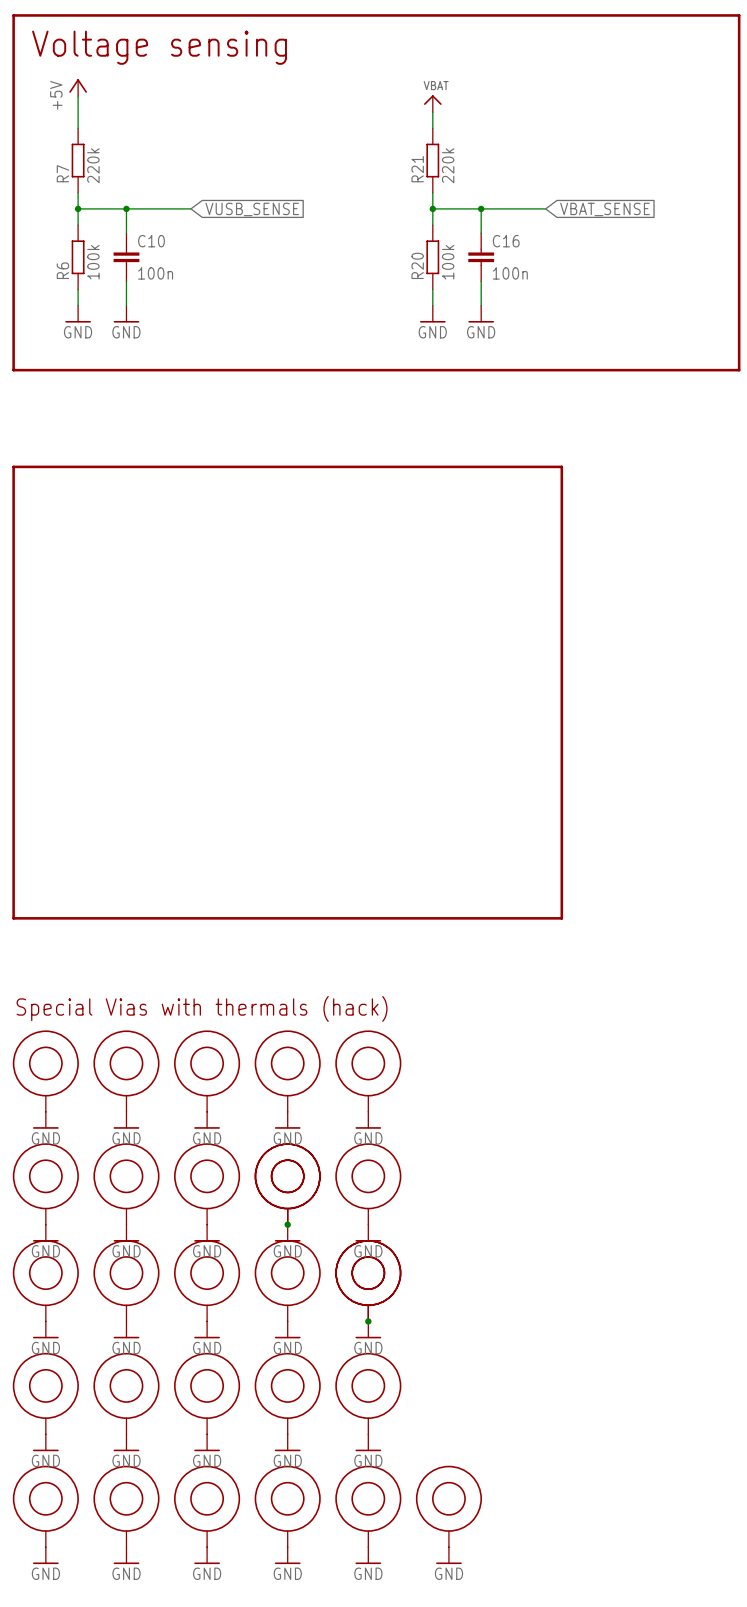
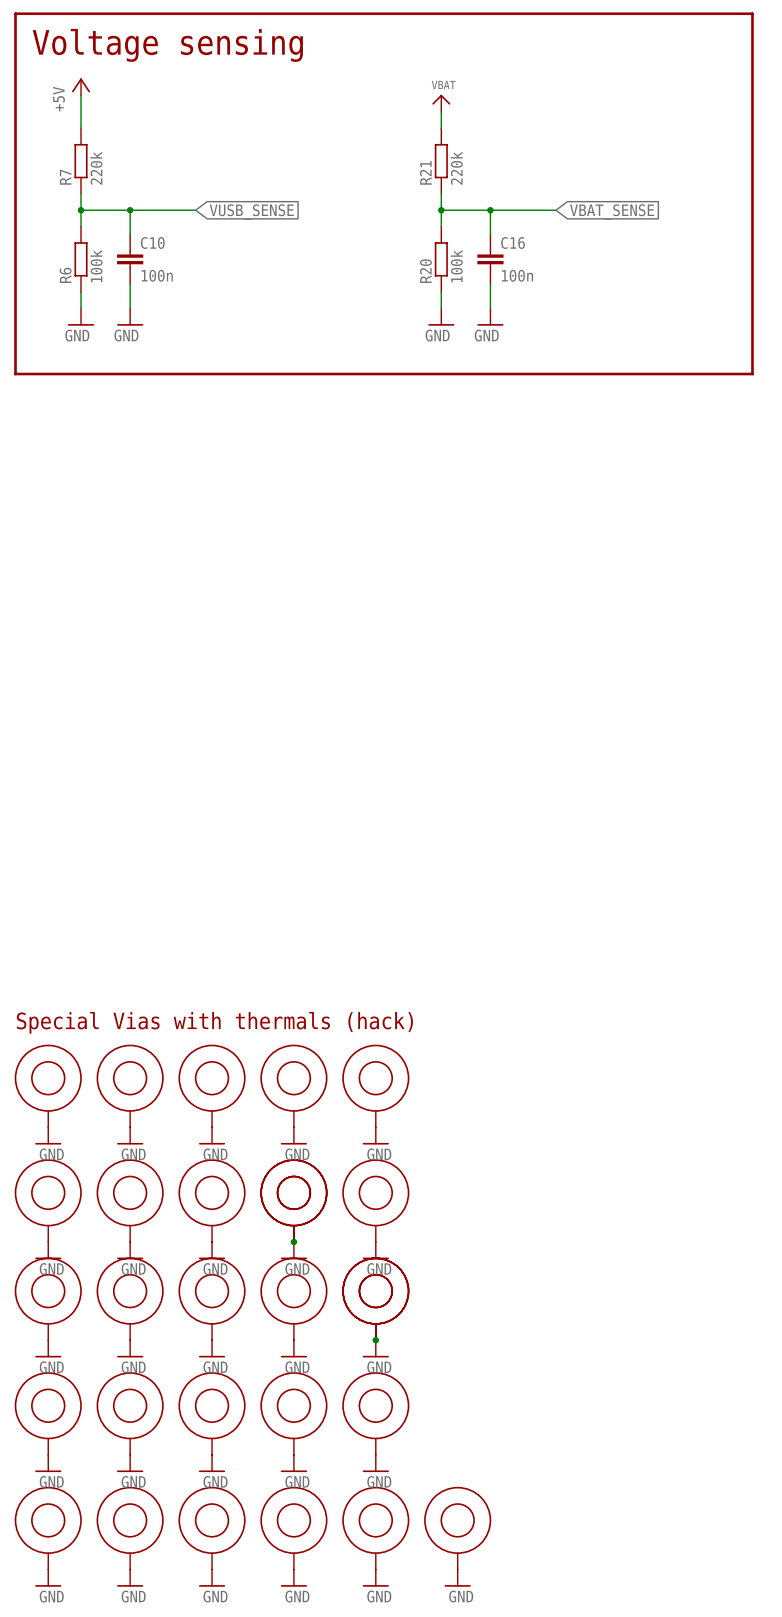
line: (13, 466) (13, 918) (561, 918) (561, 466) (13, 466) -> none

